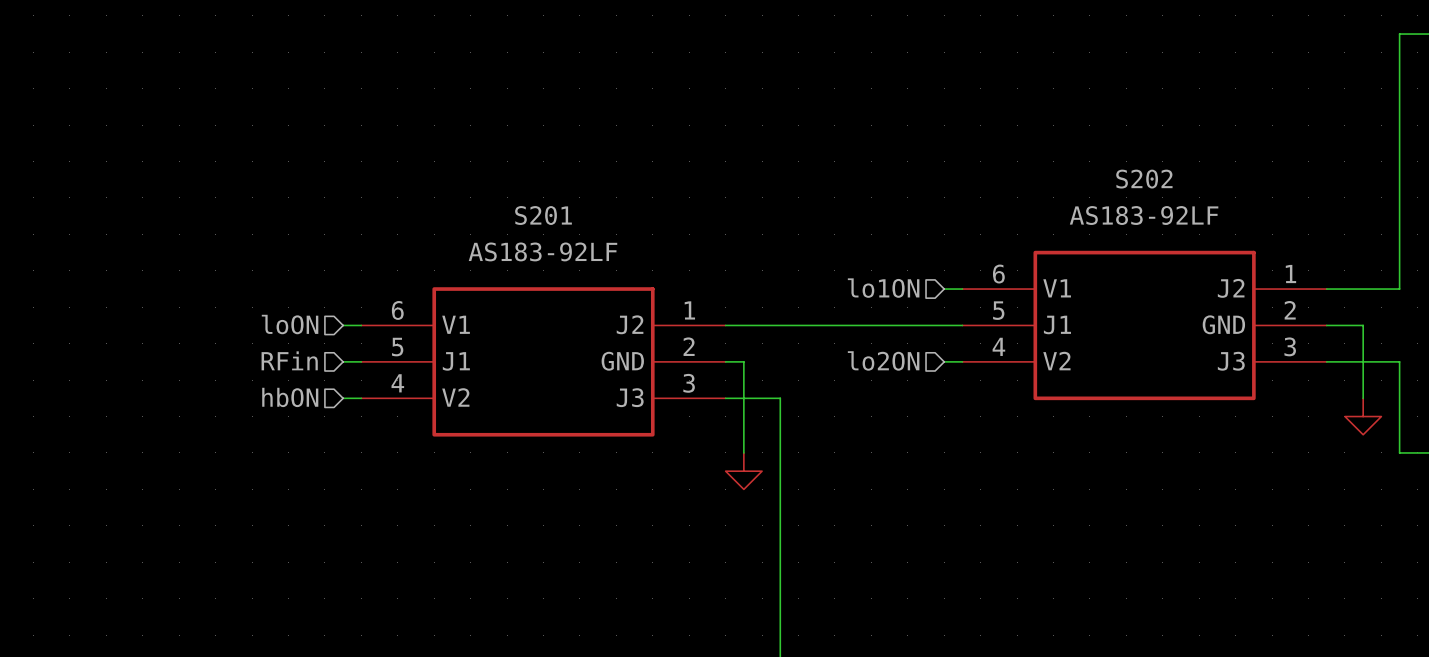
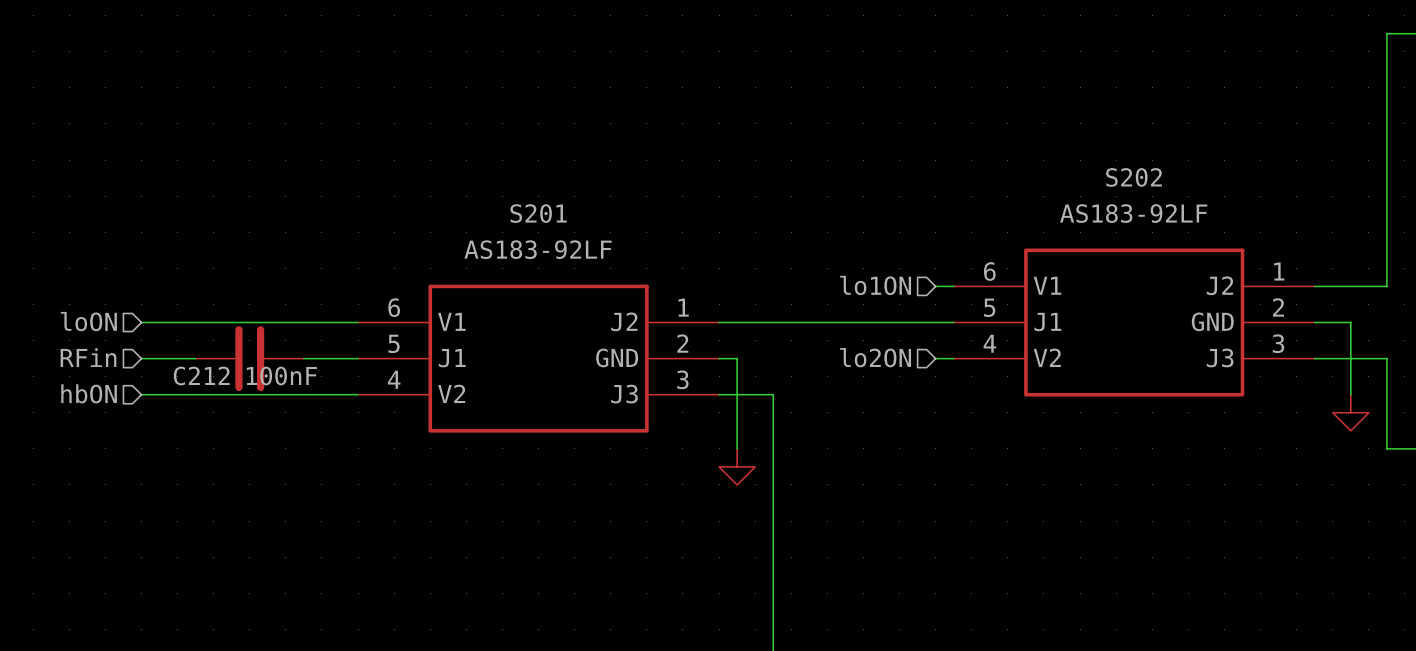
hierarchical label position: loON (290, 324) -> loON (88, 321)
wire: none -> (141, 322) (340, 322)
hierarchical label position: RFin (289, 360) -> RFin (88, 357)
wire: none -> (141, 358) (195, 358)
C212: none -> 100nF (249, 358)
wire: none -> (303, 358) (340, 358)
hierarchical label position: hbON (290, 397) -> hbON (89, 393)
wire: none -> (141, 394) (340, 394)

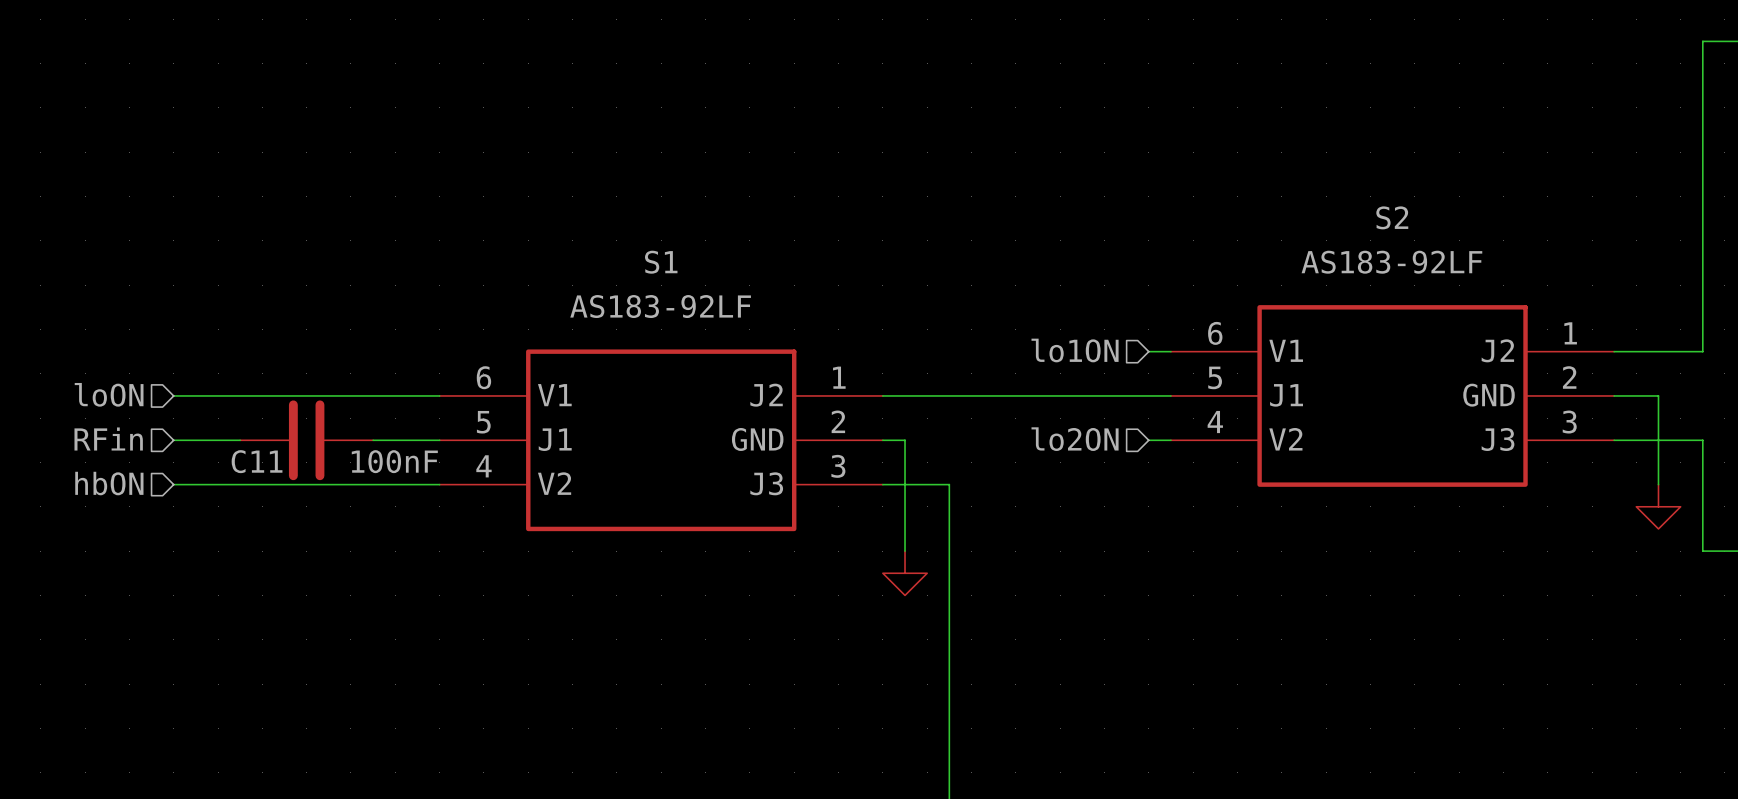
S202 name: S202 (1134, 177) -> S2 (1392, 217)
S201 name: S201 (538, 213) -> S1 (661, 262)
C212 name: C212 (201, 376) -> C11 (257, 461)
C212 value position: 100nF (281, 376) -> 100nF (394, 461)

